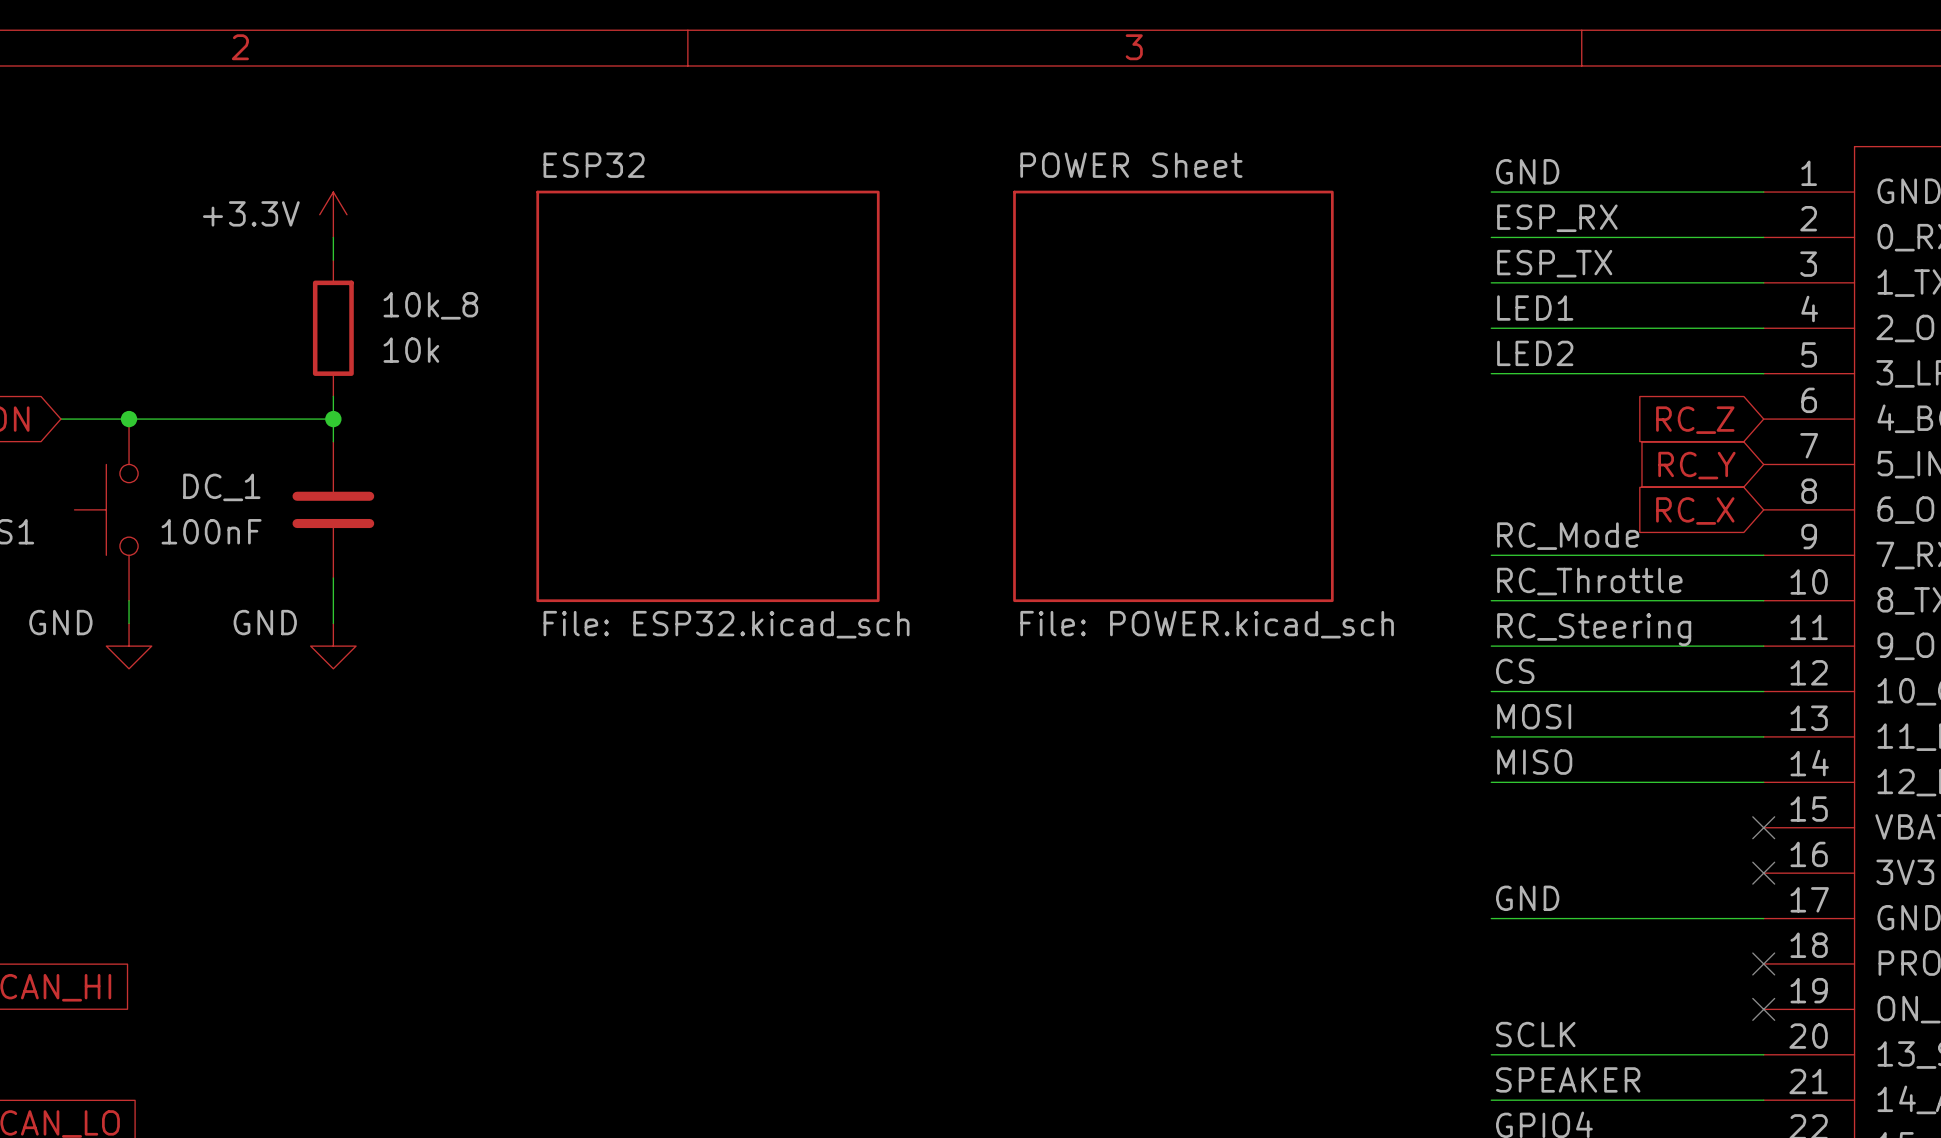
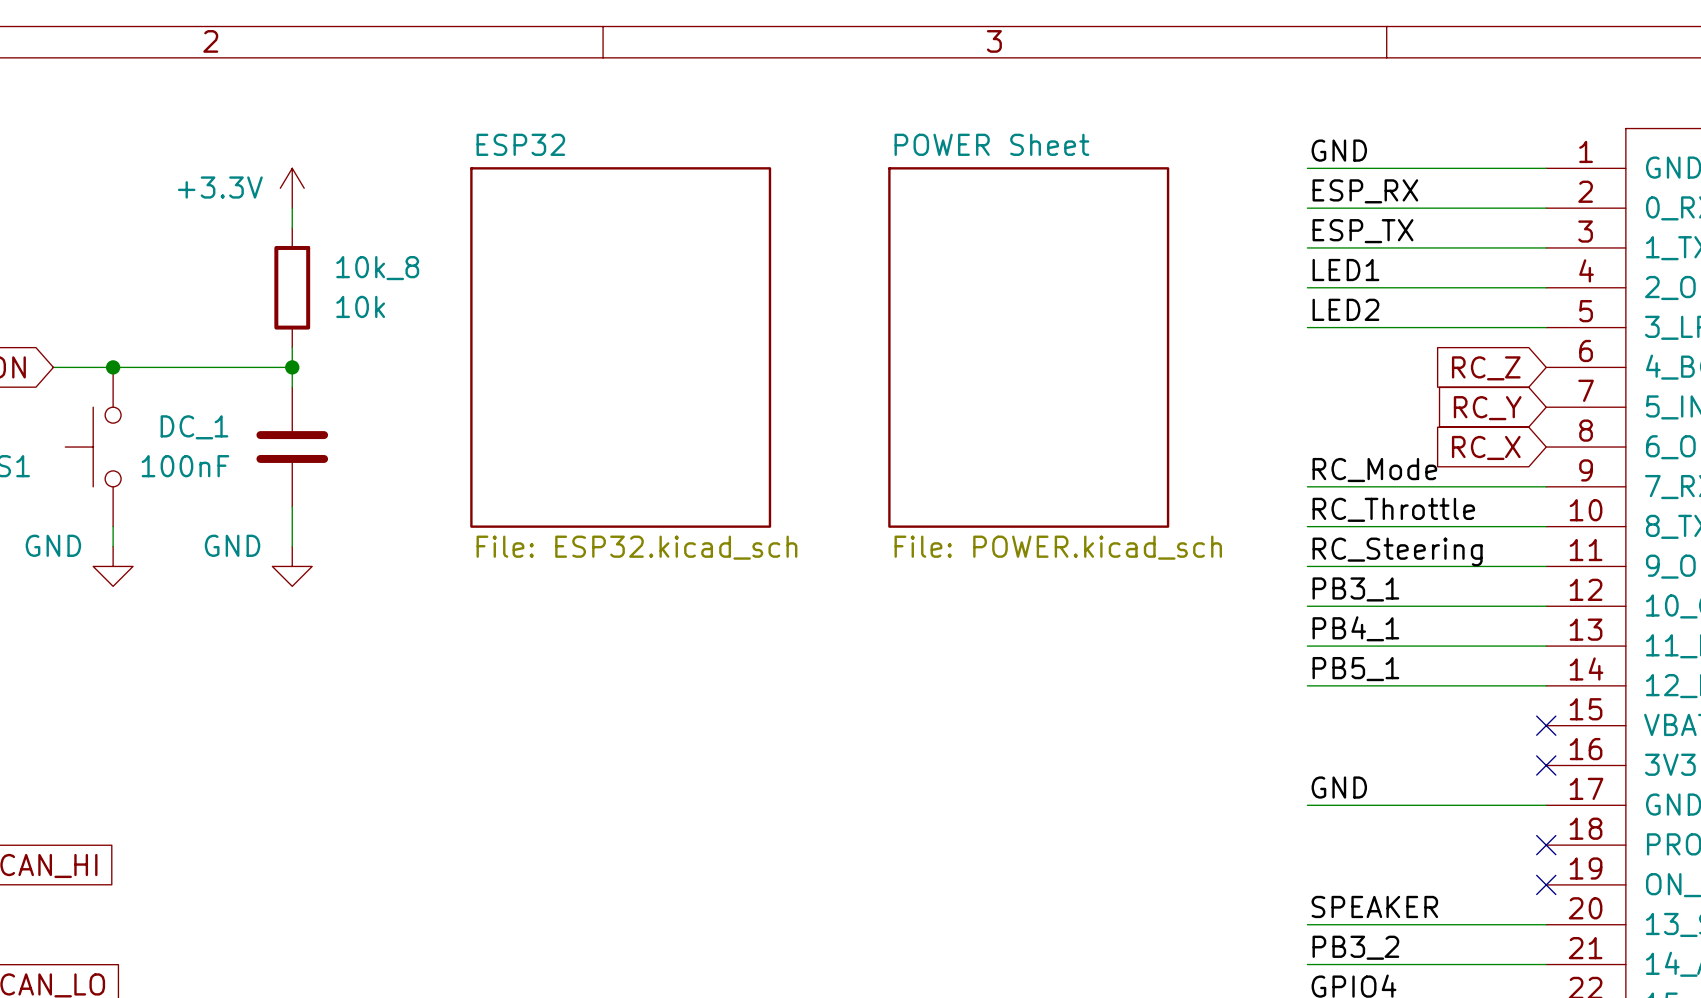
label: CS (1515, 671) -> PB3_1 (1355, 589)
label: MOSI (1534, 716) -> PB4_1 (1355, 628)
label: MISO (1534, 762) -> PB5_1 (1355, 669)
label: SCLK (1535, 1034) -> SPEAKER (1374, 906)
label: SPEAKER (1568, 1079) -> PB3_2 (1355, 947)

